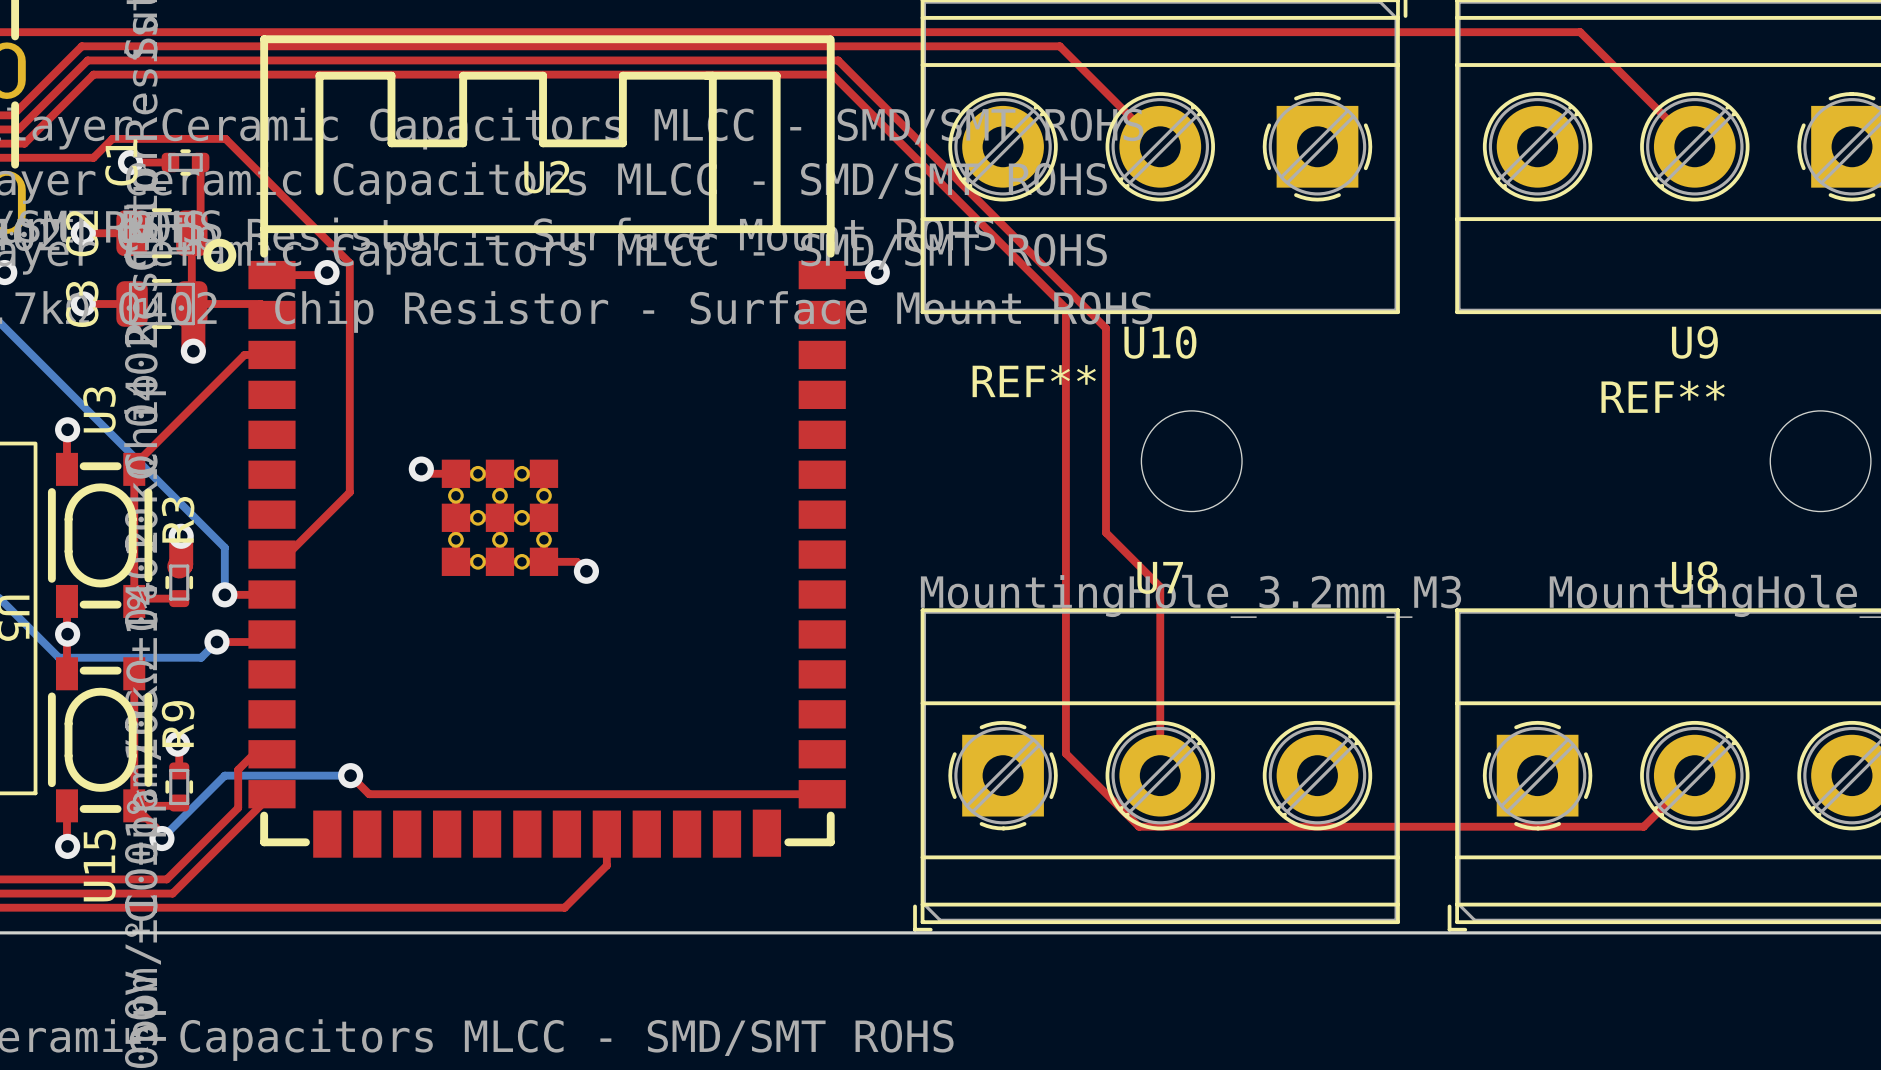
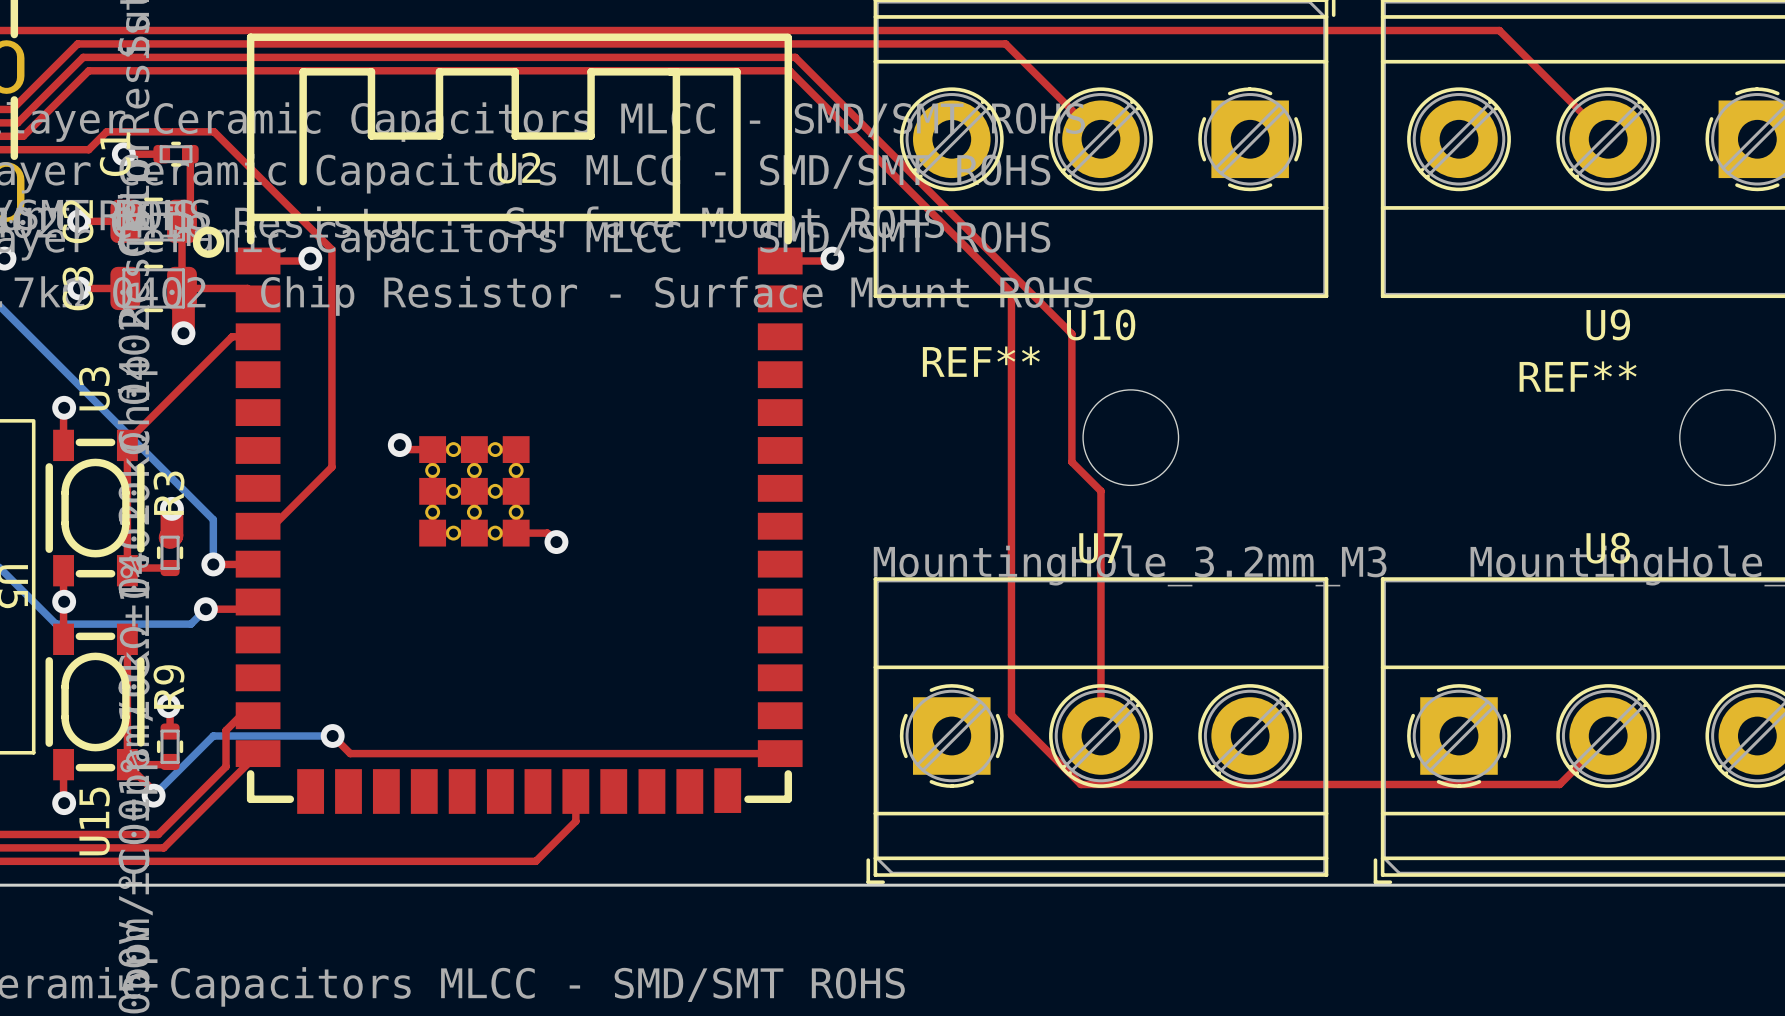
top track: (1106, 328) (1106, 532) (1160, 586) -> (1049, 311) (1071, 333) (1071, 462) (1100, 491) (1100, 556)

